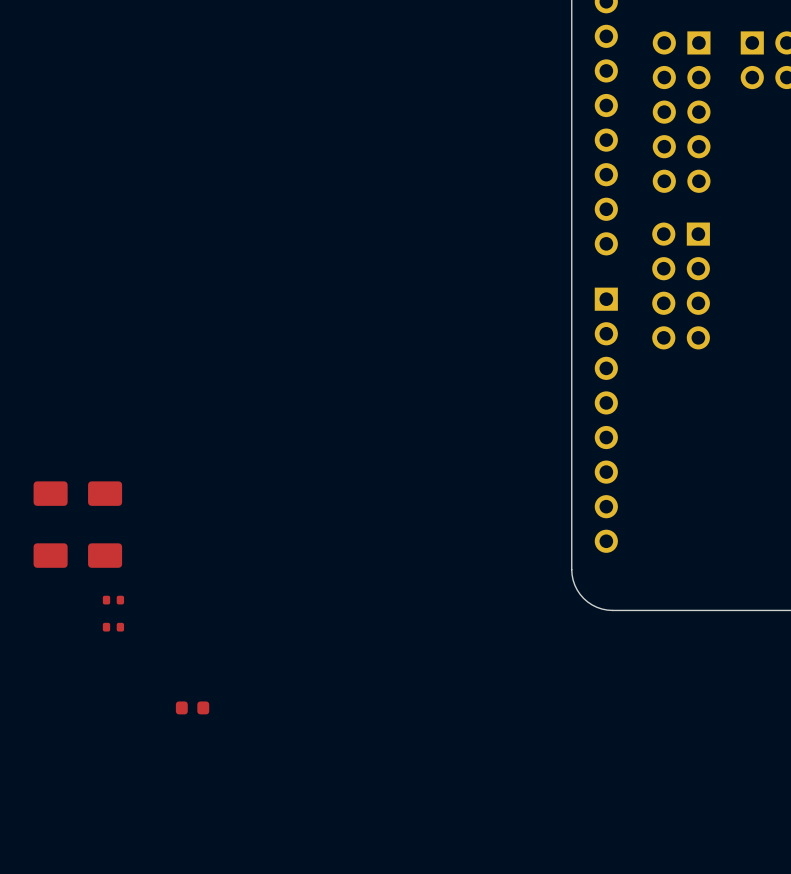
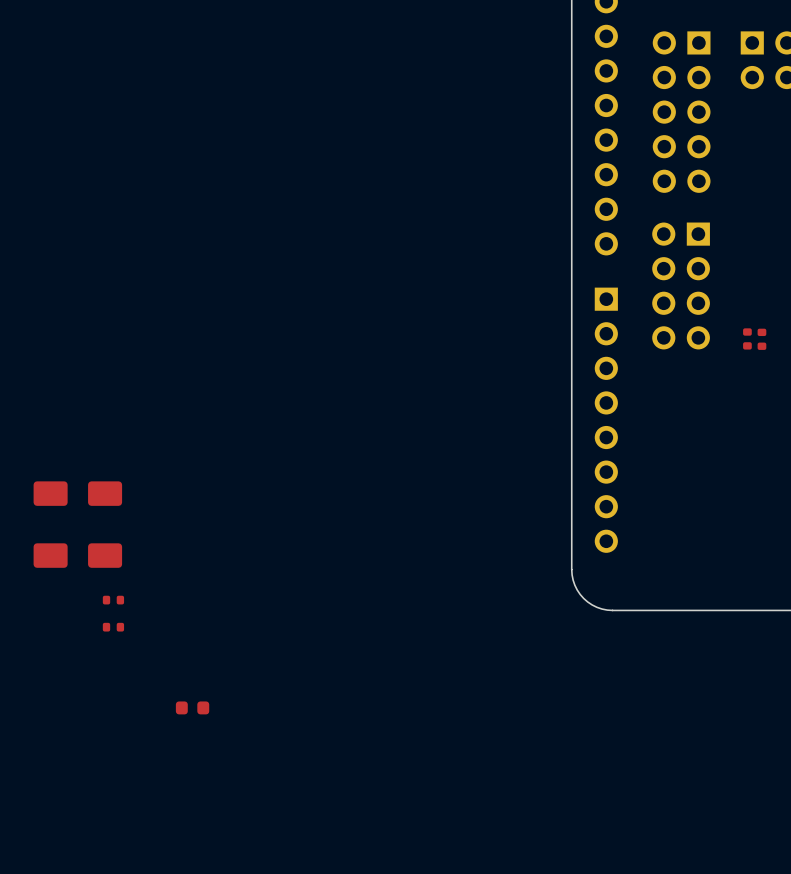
part: none -> (747, 338)
part: none -> (761, 339)

